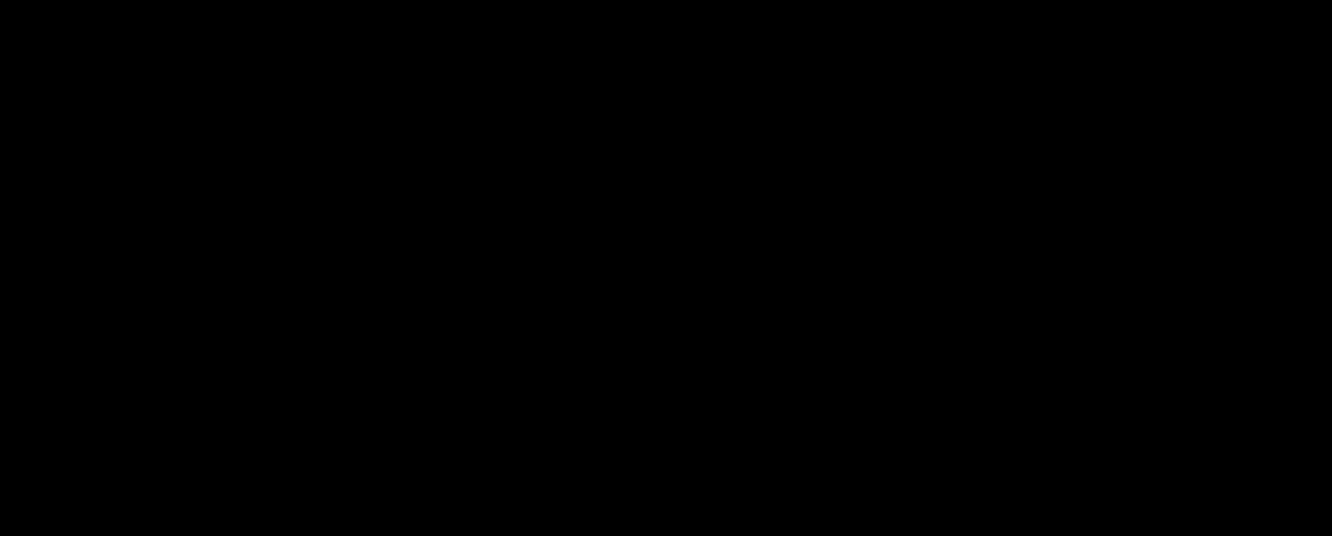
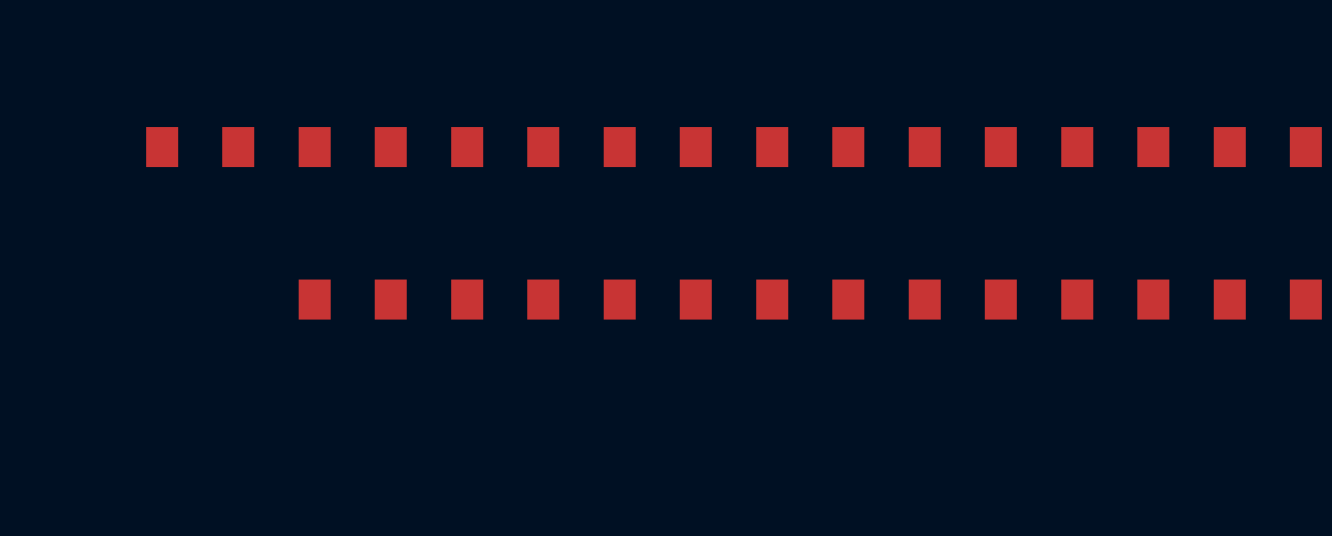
part: none -> (200, 147)
part: none -> (352, 147)
part: none -> (505, 147)
part: none -> (657, 147)
part: none -> (810, 147)
part: none -> (962, 147)
part: none -> (1115, 147)
part: none -> (1267, 147)
part: none -> (352, 299)
part: none -> (505, 299)
part: none -> (657, 299)
part: none -> (810, 299)
part: none -> (962, 299)
part: none -> (1115, 299)
part: none -> (1267, 299)

